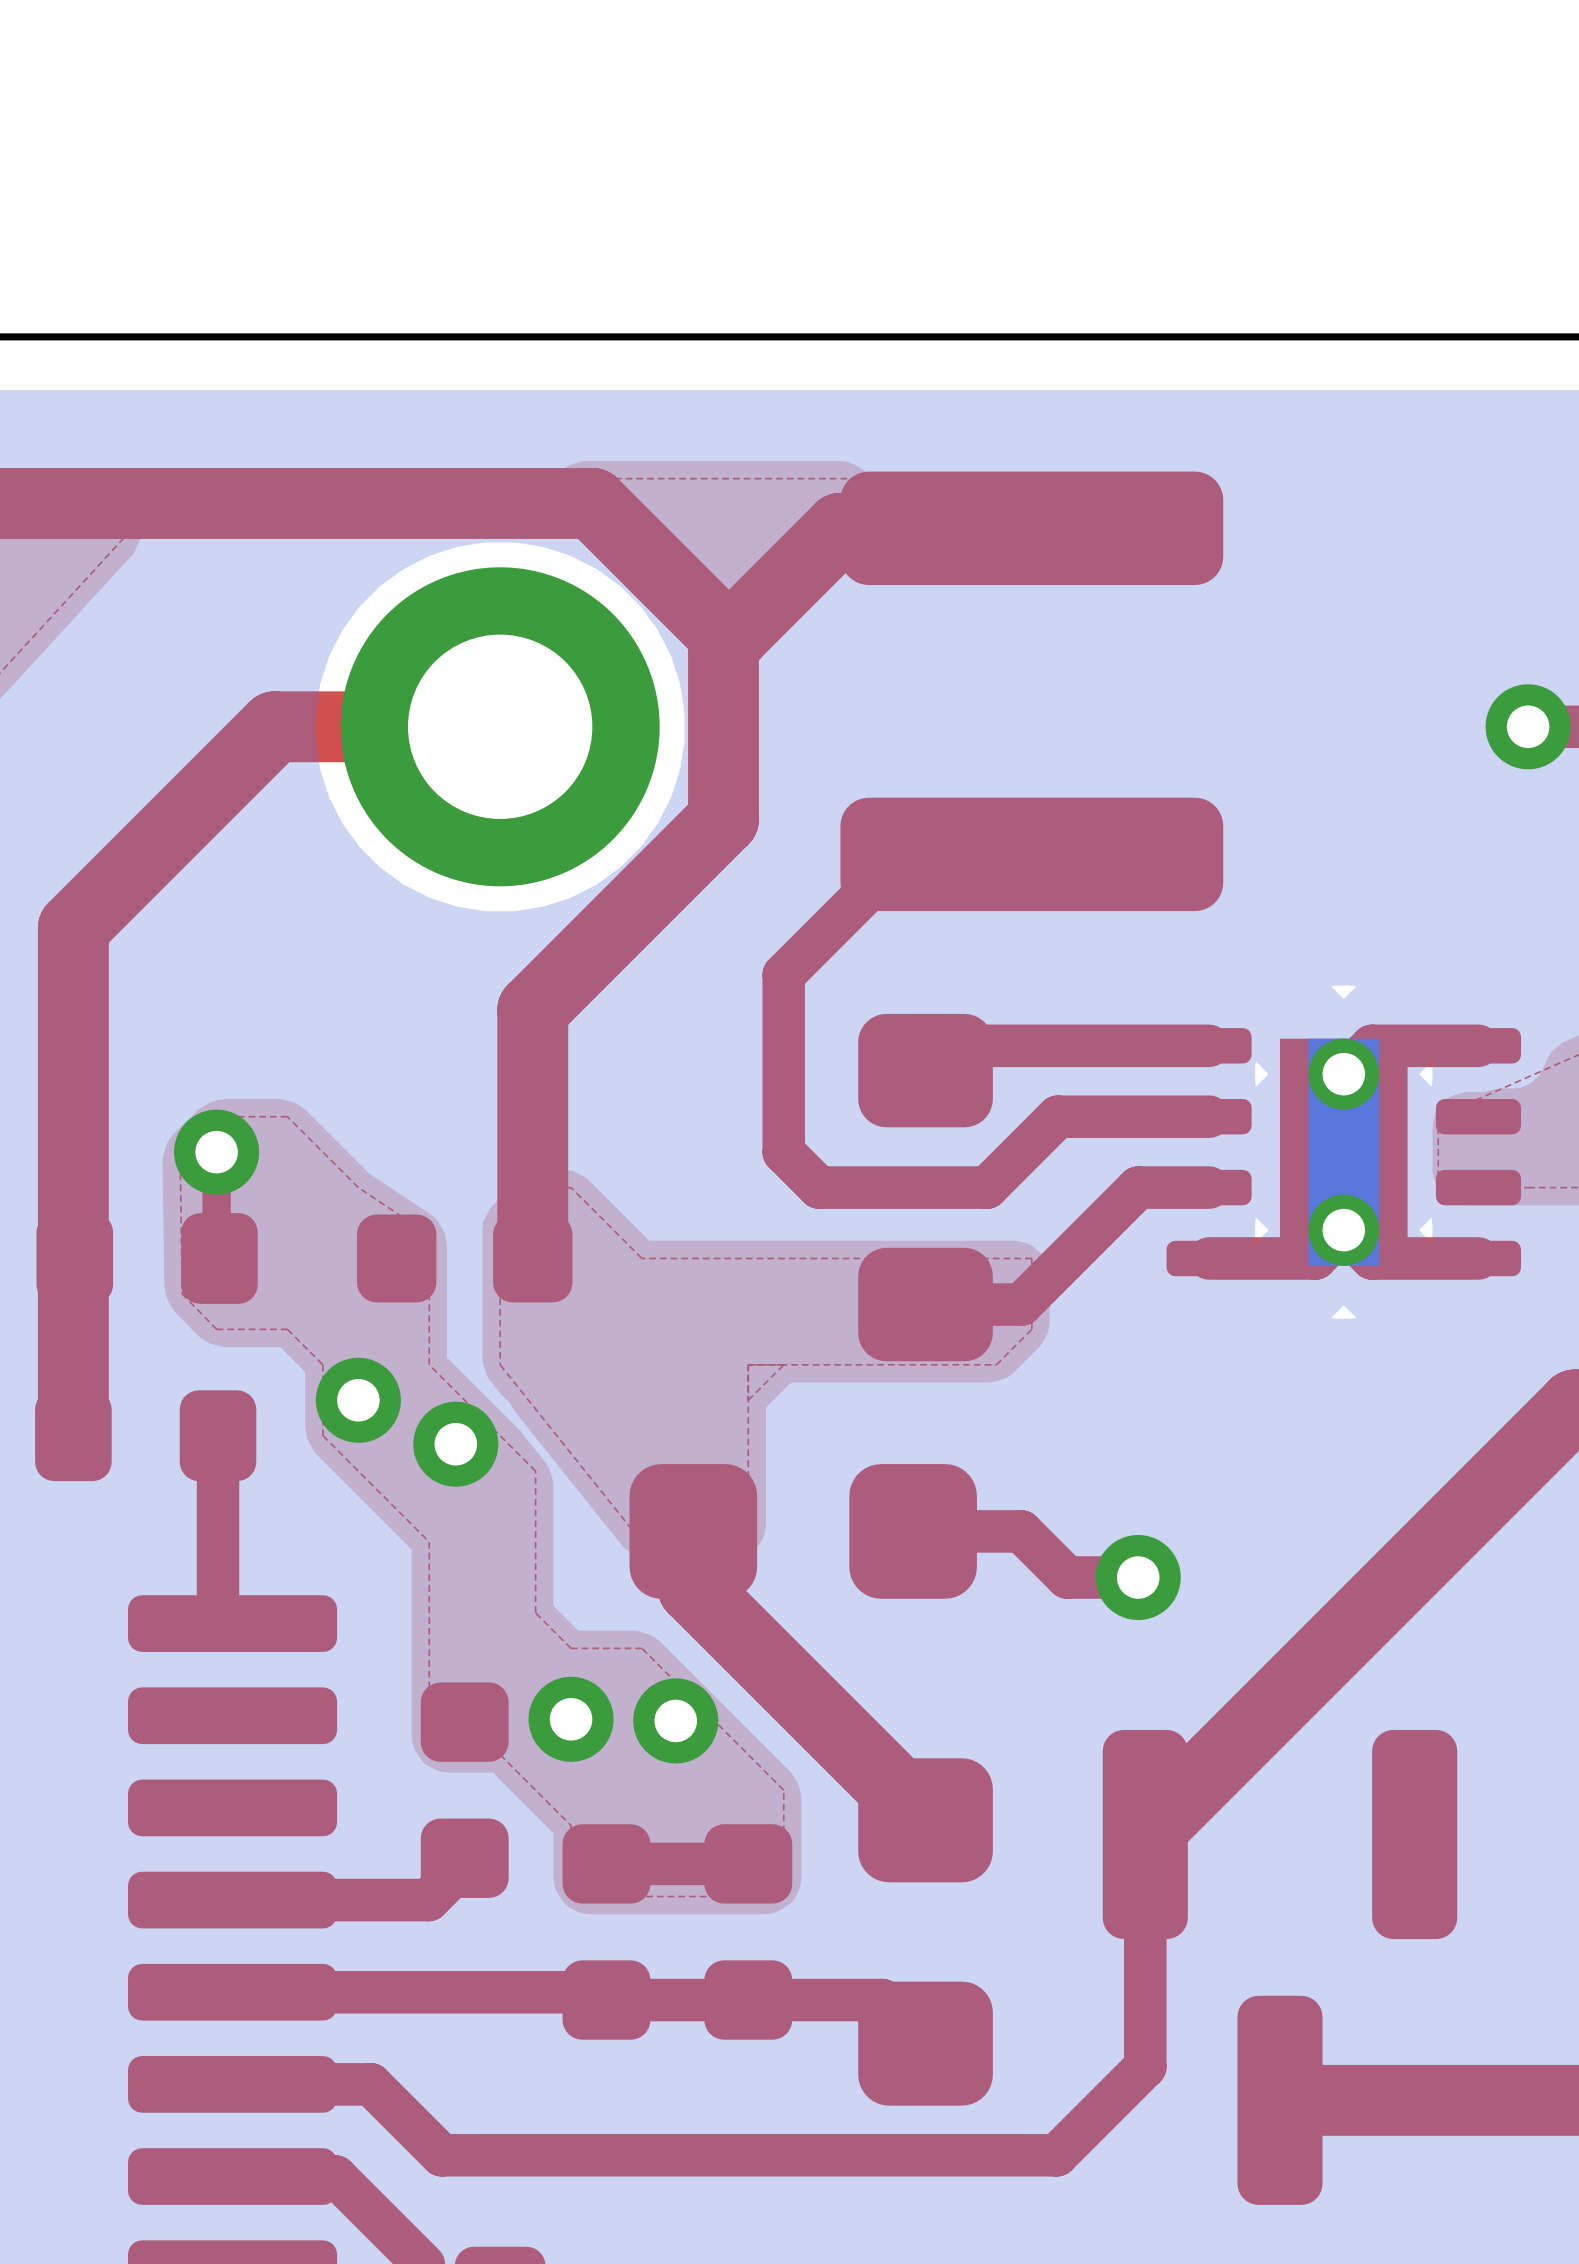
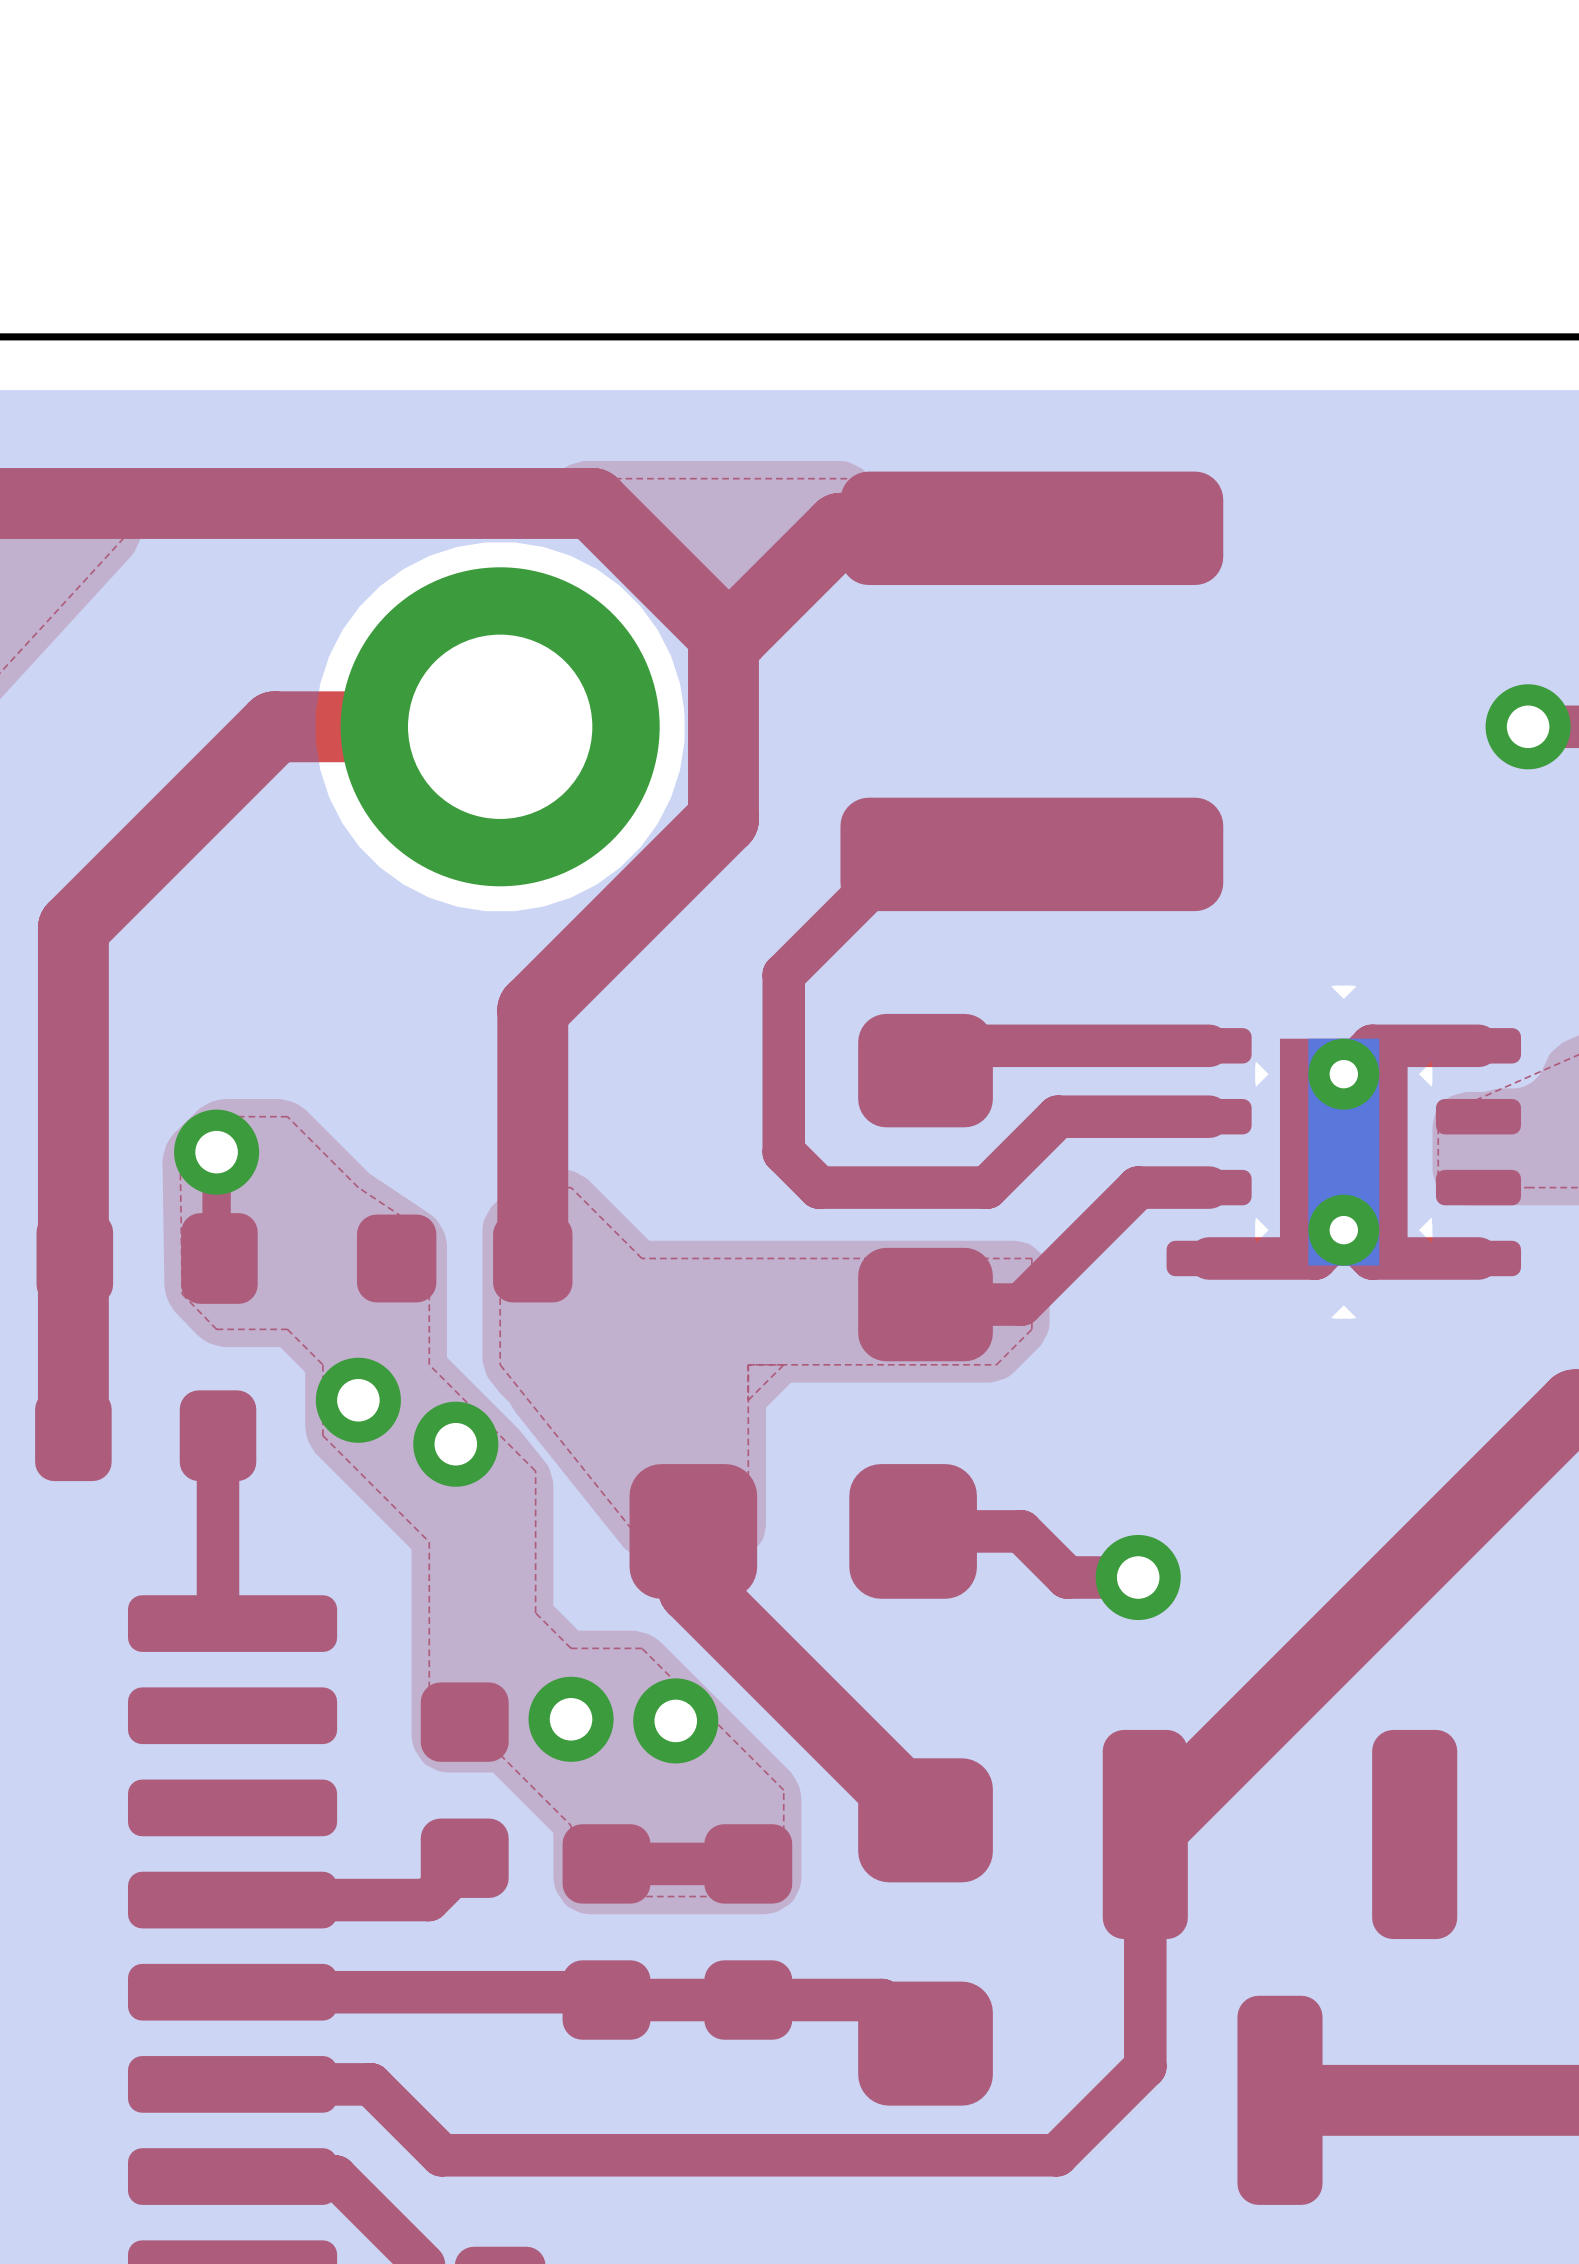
part footprint: [1166, 1028, 1522, 1277] -> [1166, 1028, 1522, 1277]

